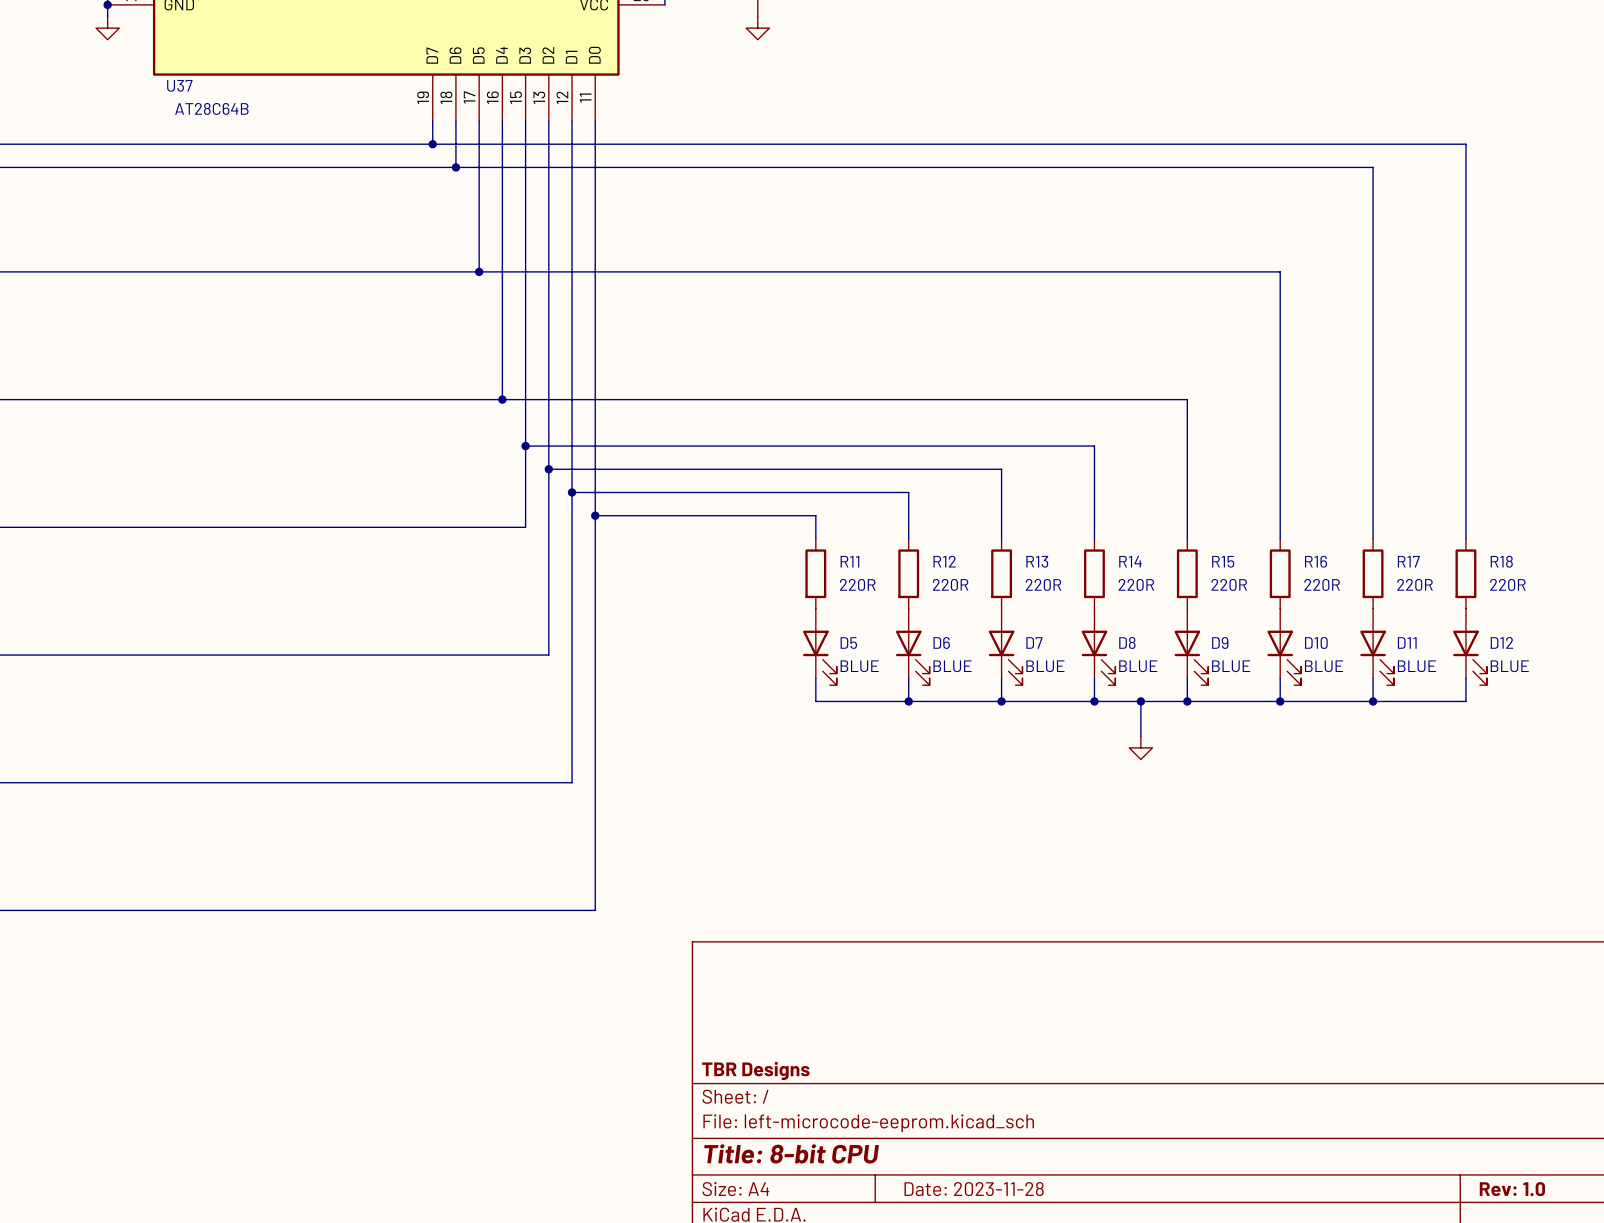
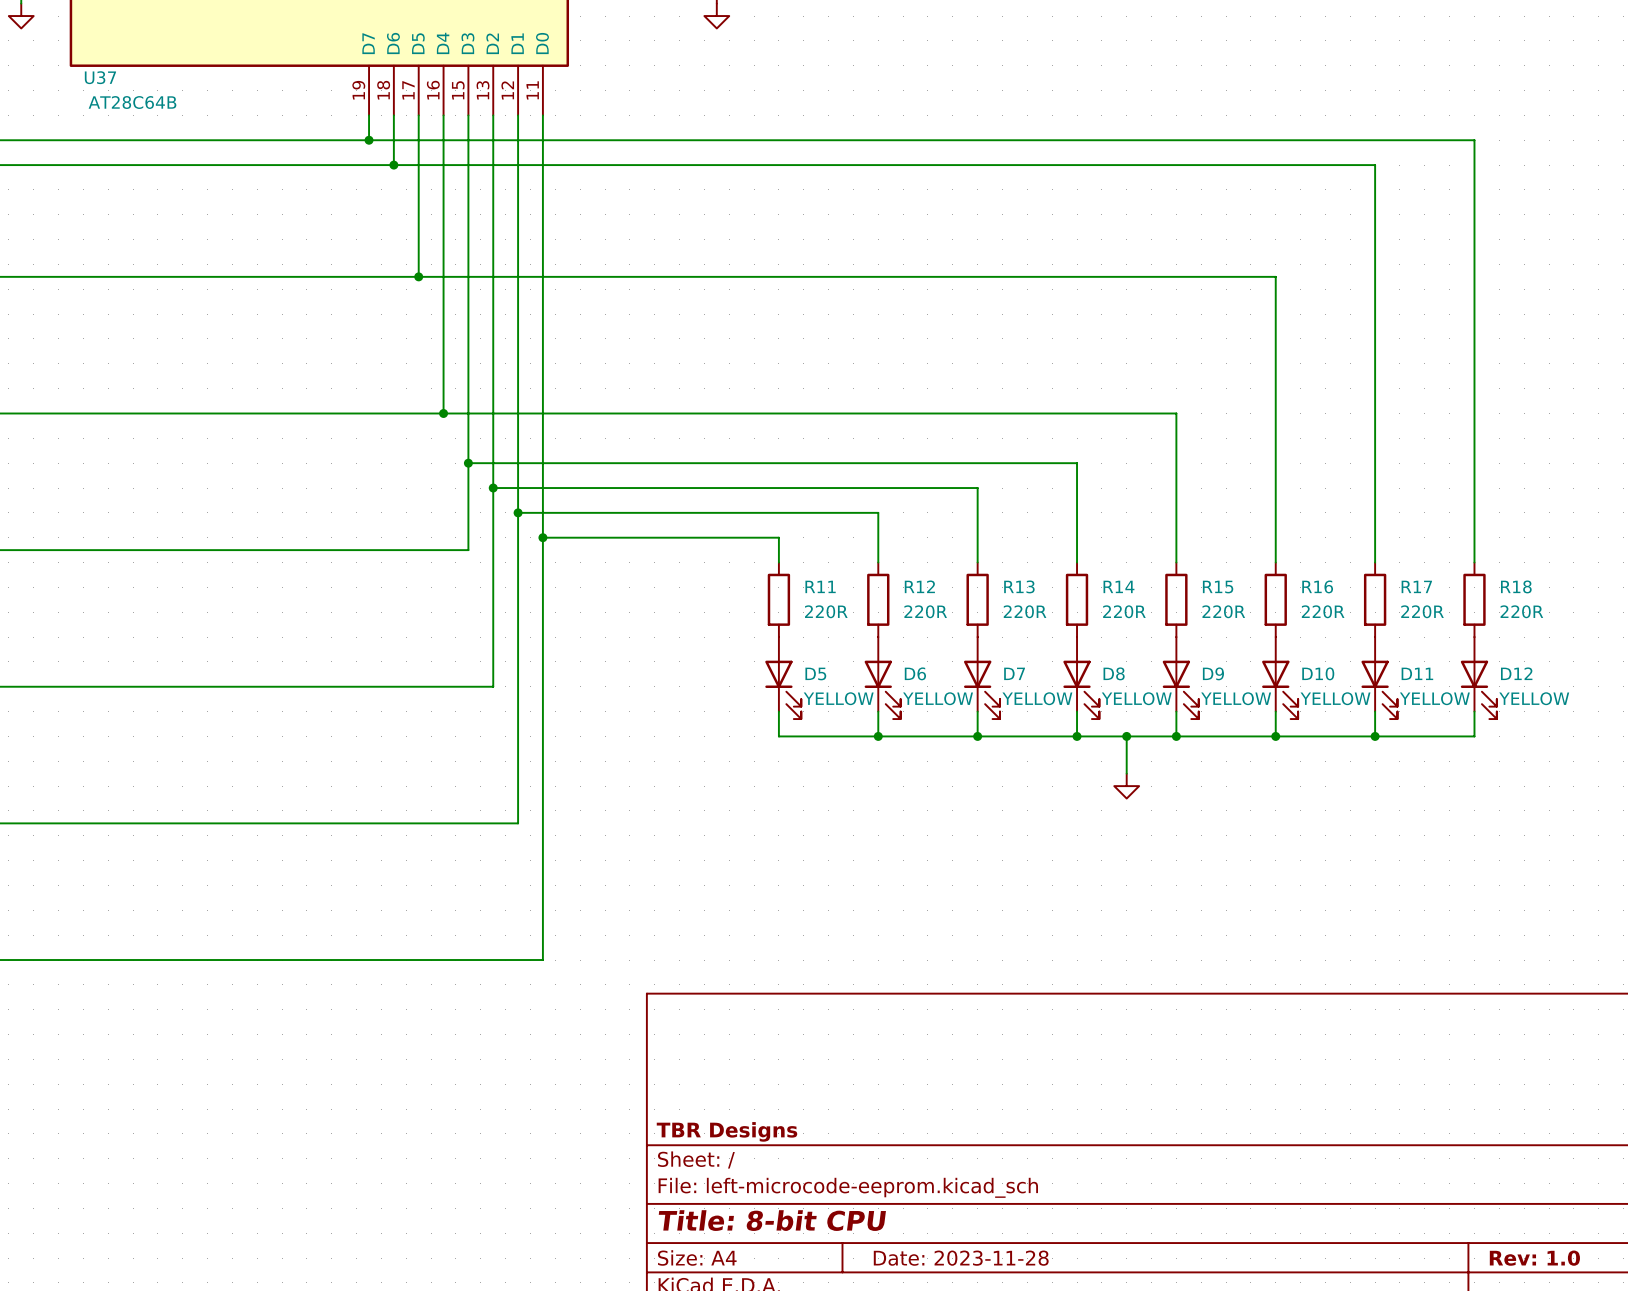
D5 value: BLUE (859, 666) -> YELLOW (838, 698)
D6 value: BLUE (952, 666) -> YELLOW (938, 698)
D7 value: BLUE (1045, 666) -> YELLOW (1037, 698)
D8 value: BLUE (1138, 666) -> YELLOW (1136, 698)
D9 value: BLUE (1231, 666) -> YELLOW (1236, 698)
D10 value: BLUE (1324, 666) -> YELLOW (1335, 698)
D11 value: BLUE (1416, 666) -> YELLOW (1434, 698)
D12 value: BLUE (1509, 666) -> YELLOW (1534, 698)

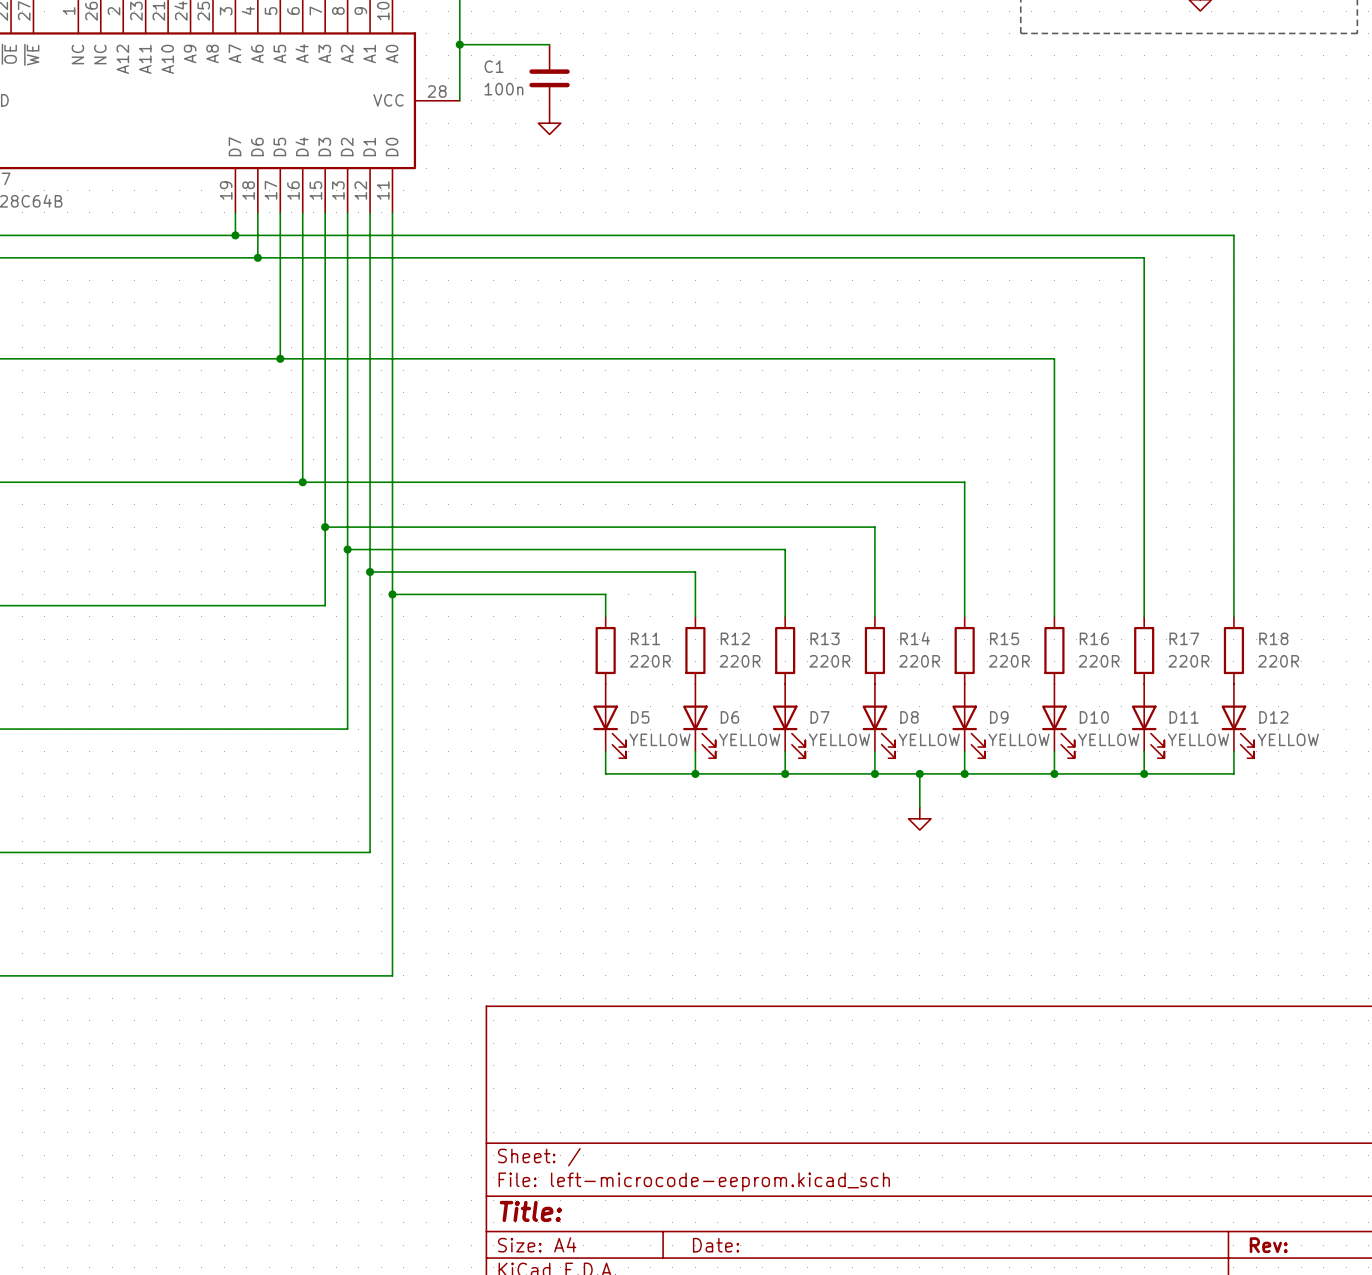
title block: TBR Designs (726, 1131) -> none
title block: Title: 8-bit CPU (772, 1220) -> Title: (530, 1211)
title block: Date: 2023-11-28 (961, 1258) -> Date: (716, 1245)
title block: Rev: 1.0 (1534, 1258) -> Rev: (1268, 1245)

